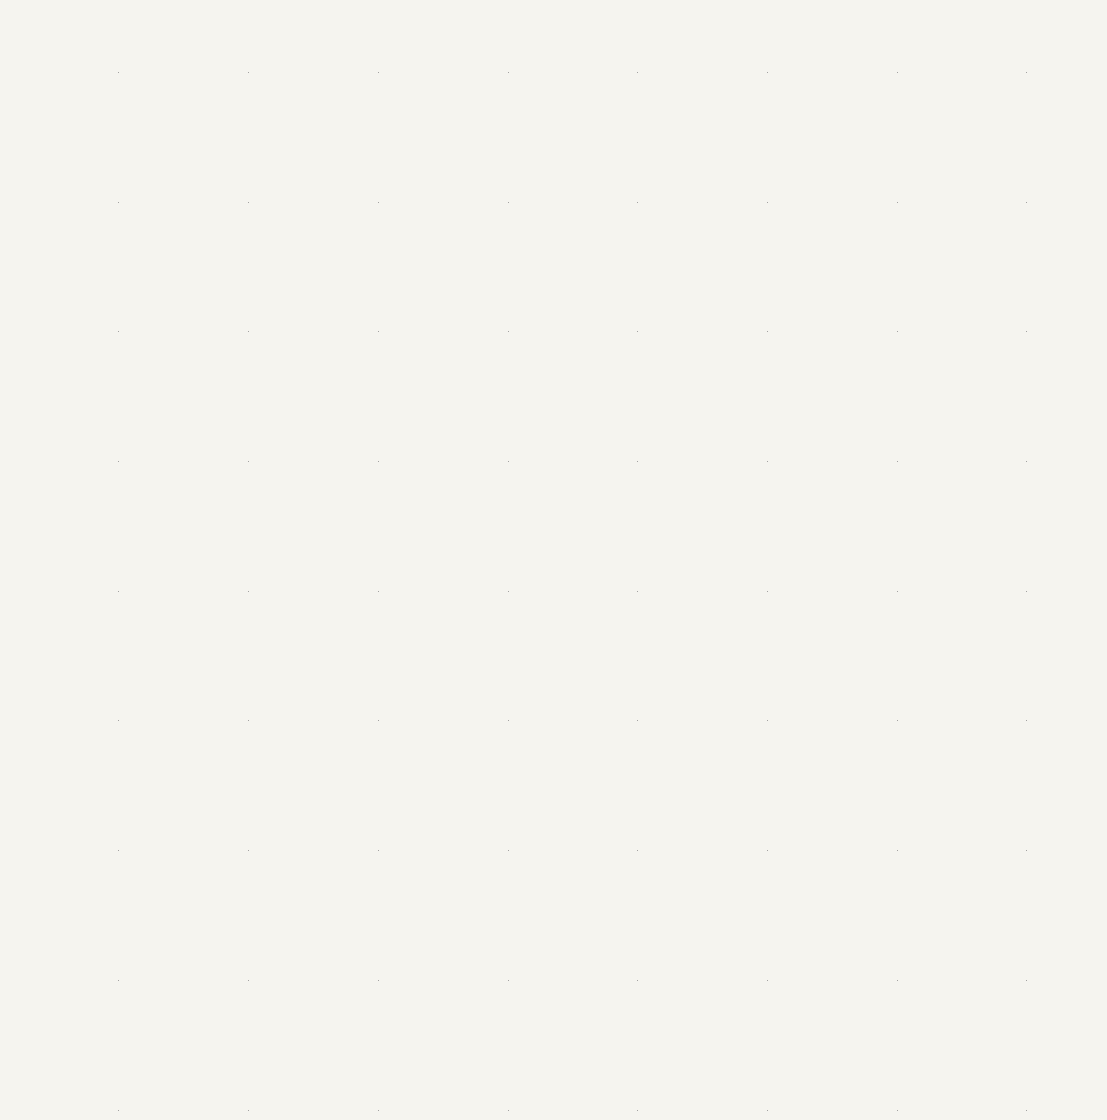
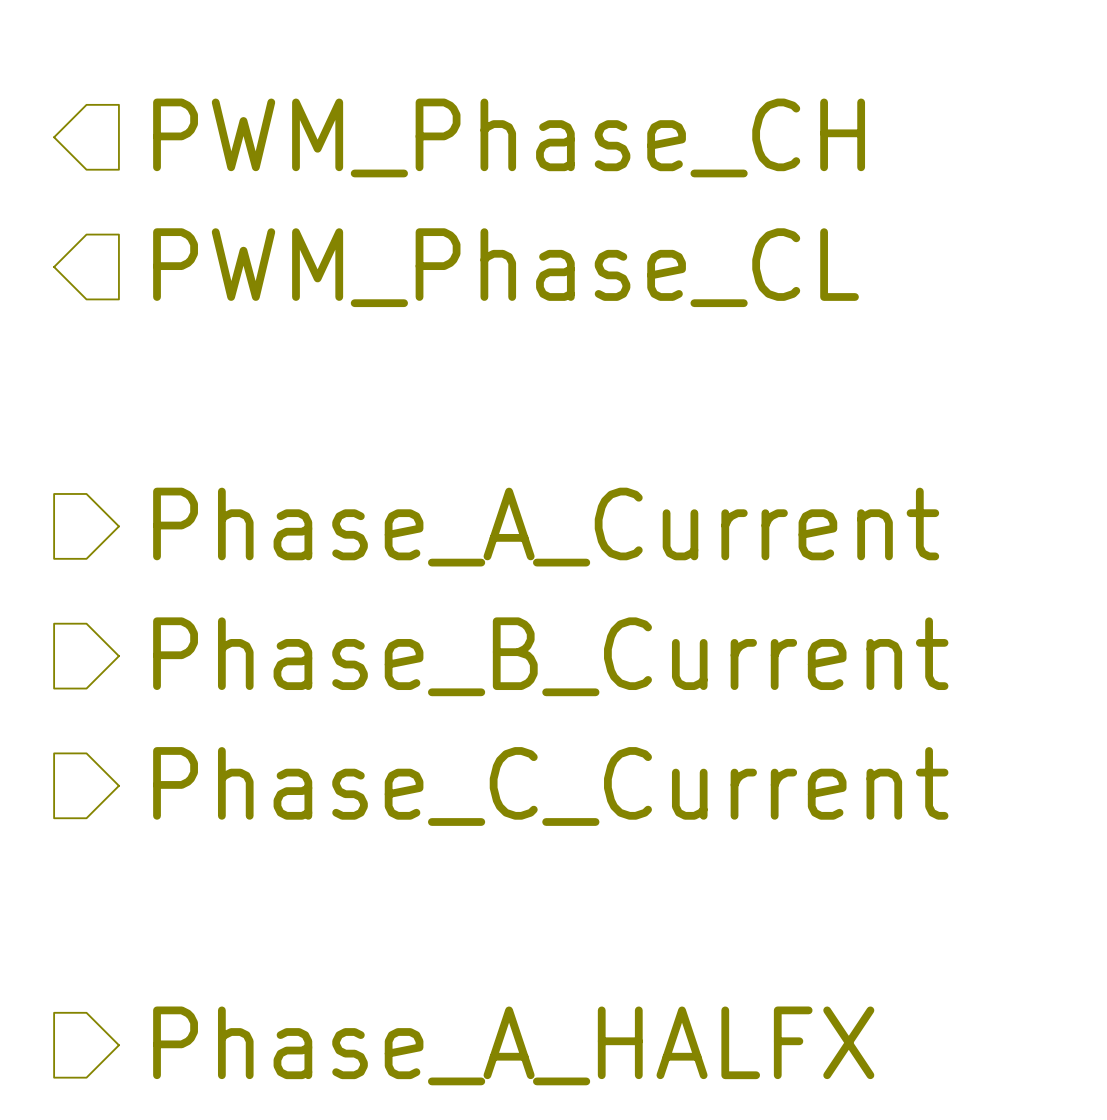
hierarchical label: none -> PWM_Phase_CH (509, 137)
hierarchical label: none -> PWM_Phase_CL (505, 267)
hierarchical label: none -> Phase_A_Current (546, 527)
hierarchical label: none -> Phase_B_Current (550, 656)
hierarchical label: none -> Phase_C_Current (550, 786)
hierarchical label: none -> Phase_A_HALFX (513, 1045)

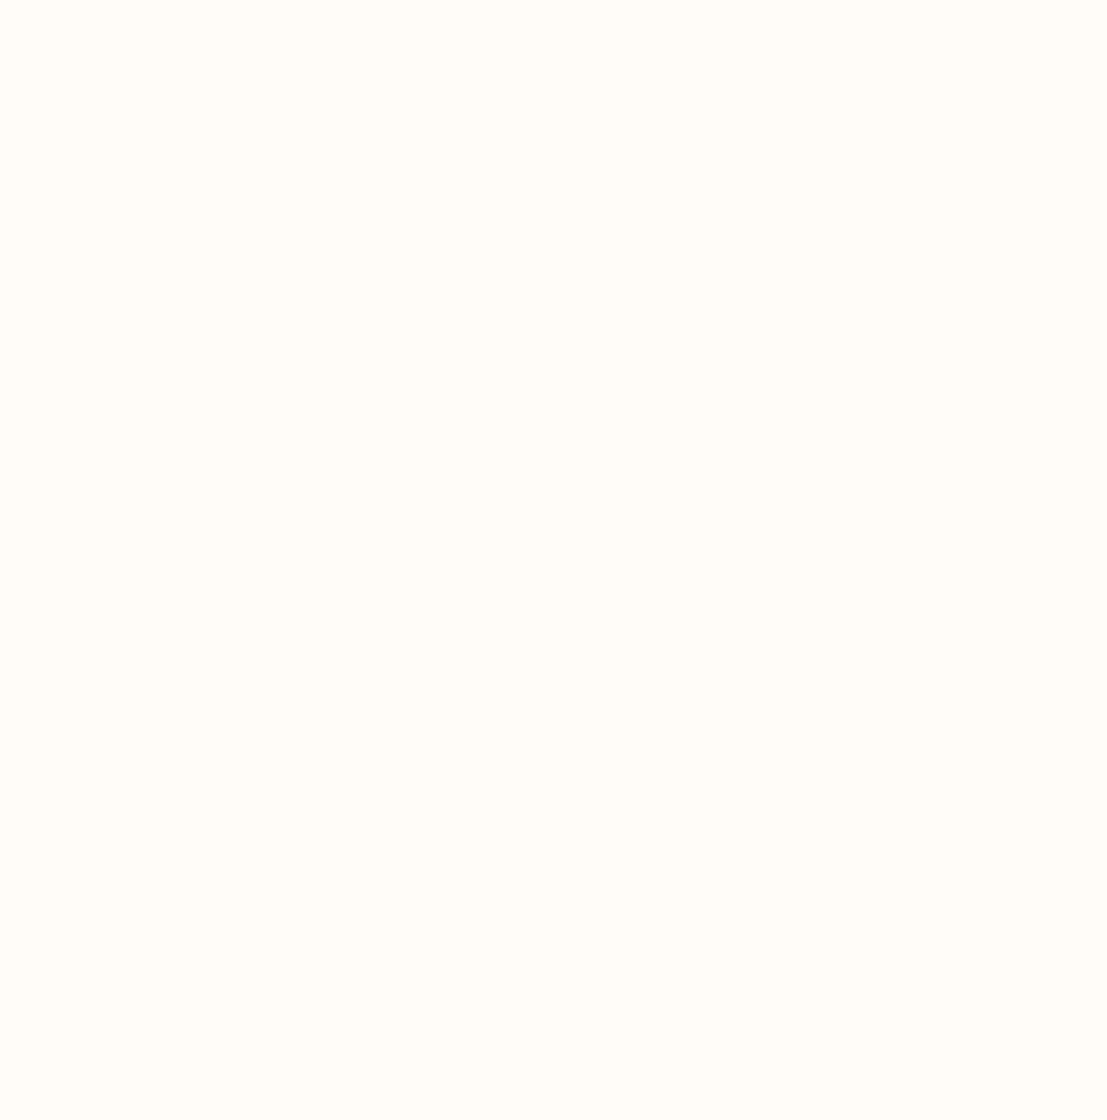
hierarchical label: PWM_Phase_CH (509, 137) -> none
hierarchical label: PWM_Phase_CL (505, 267) -> none
hierarchical label: Phase_A_Current (546, 527) -> none
hierarchical label: Phase_B_Current (550, 656) -> none
hierarchical label: Phase_C_Current (550, 786) -> none
hierarchical label: Phase_A_HALFX (513, 1045) -> none

